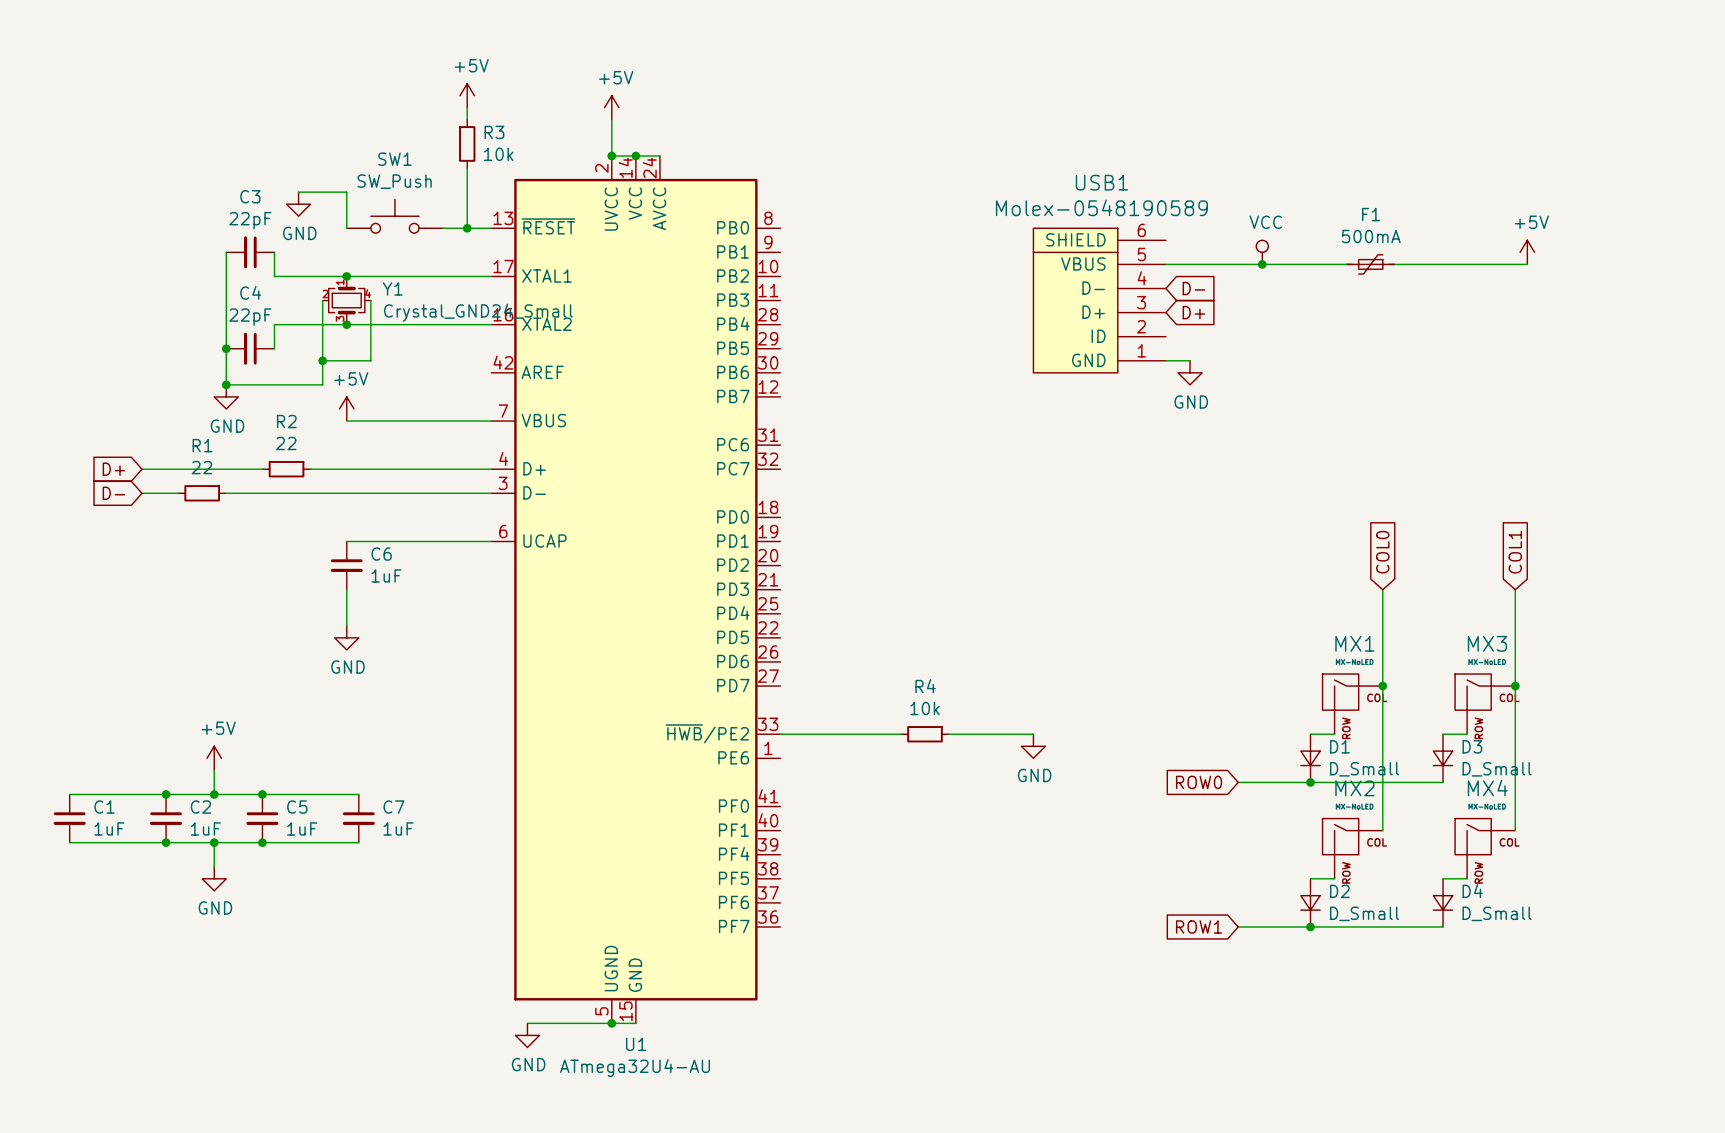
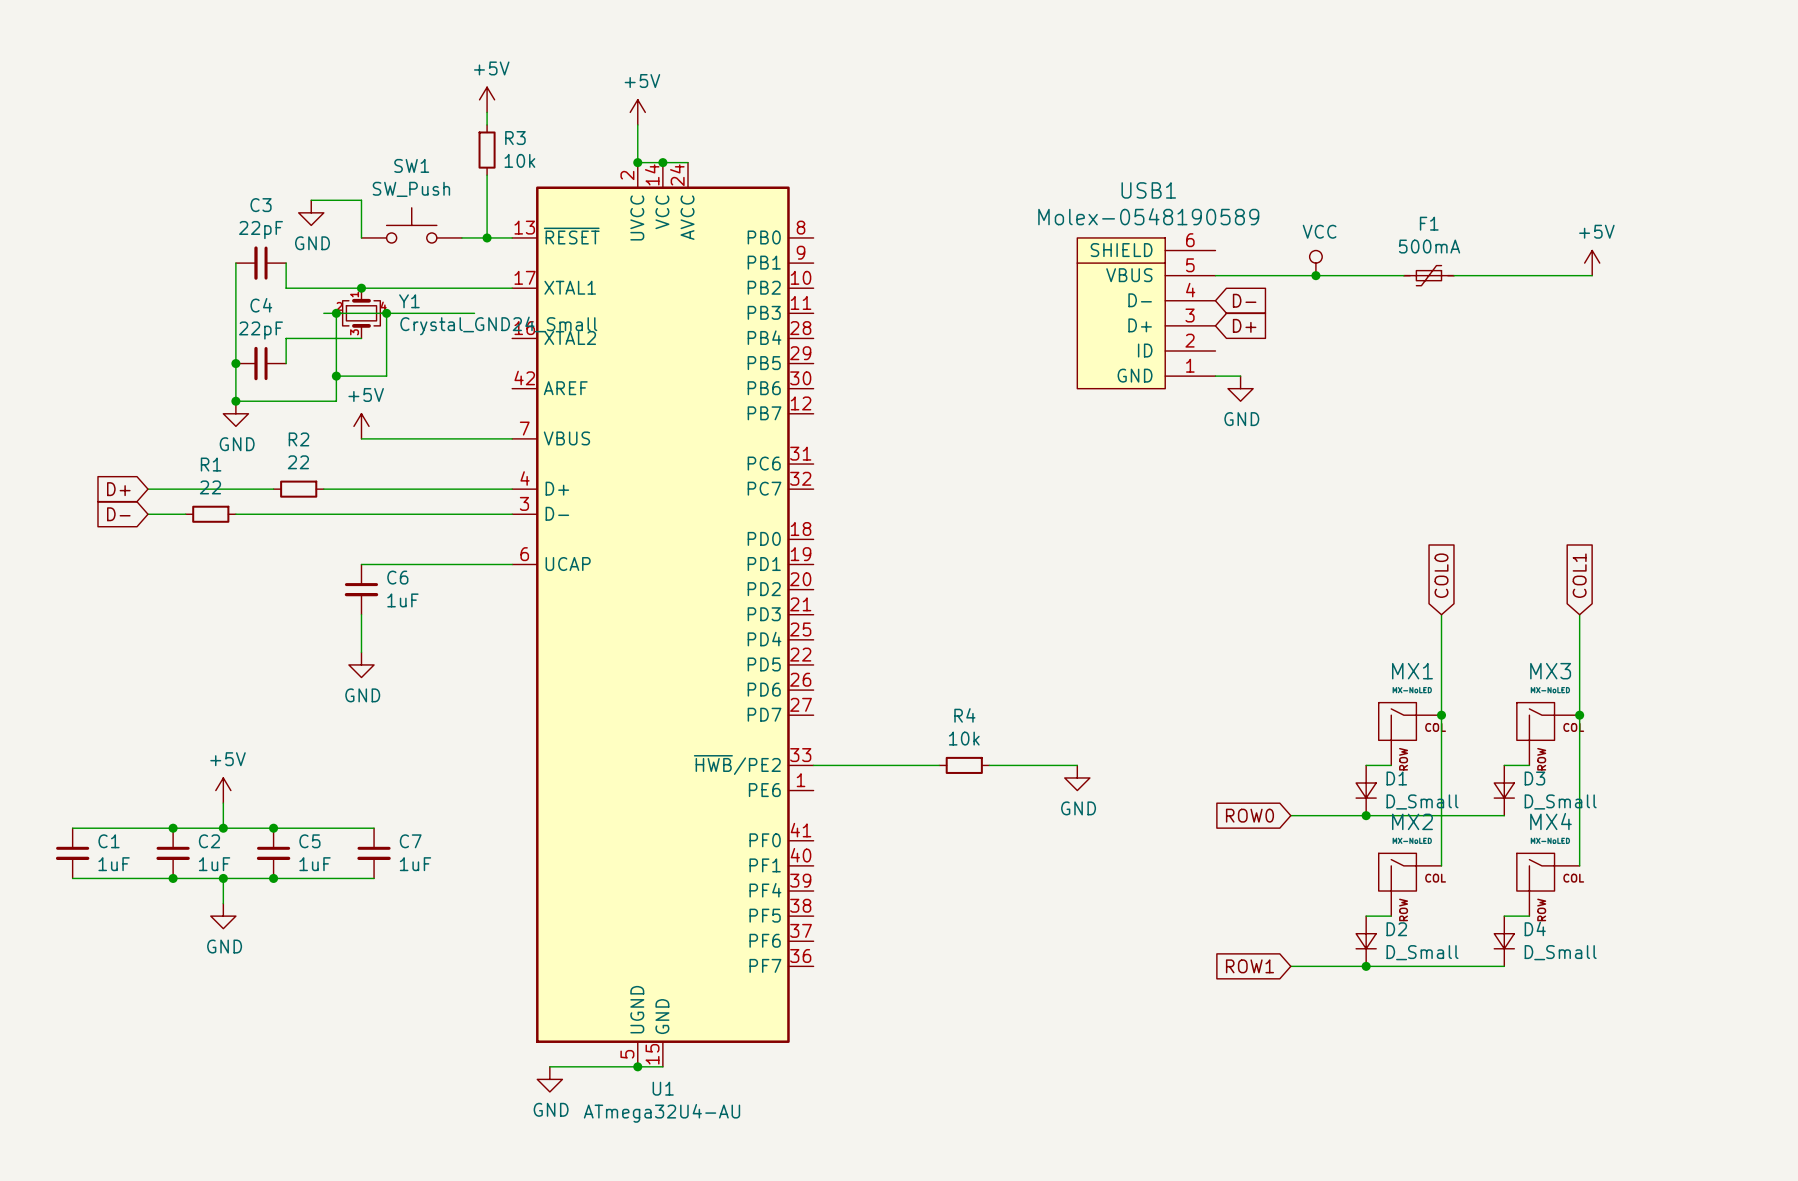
junction: none -> (336, 313)
junction: none -> (386, 313)
wire: (346, 324) (491, 324) -> (323, 313) (474, 313)
junction: (346, 324) -> none

